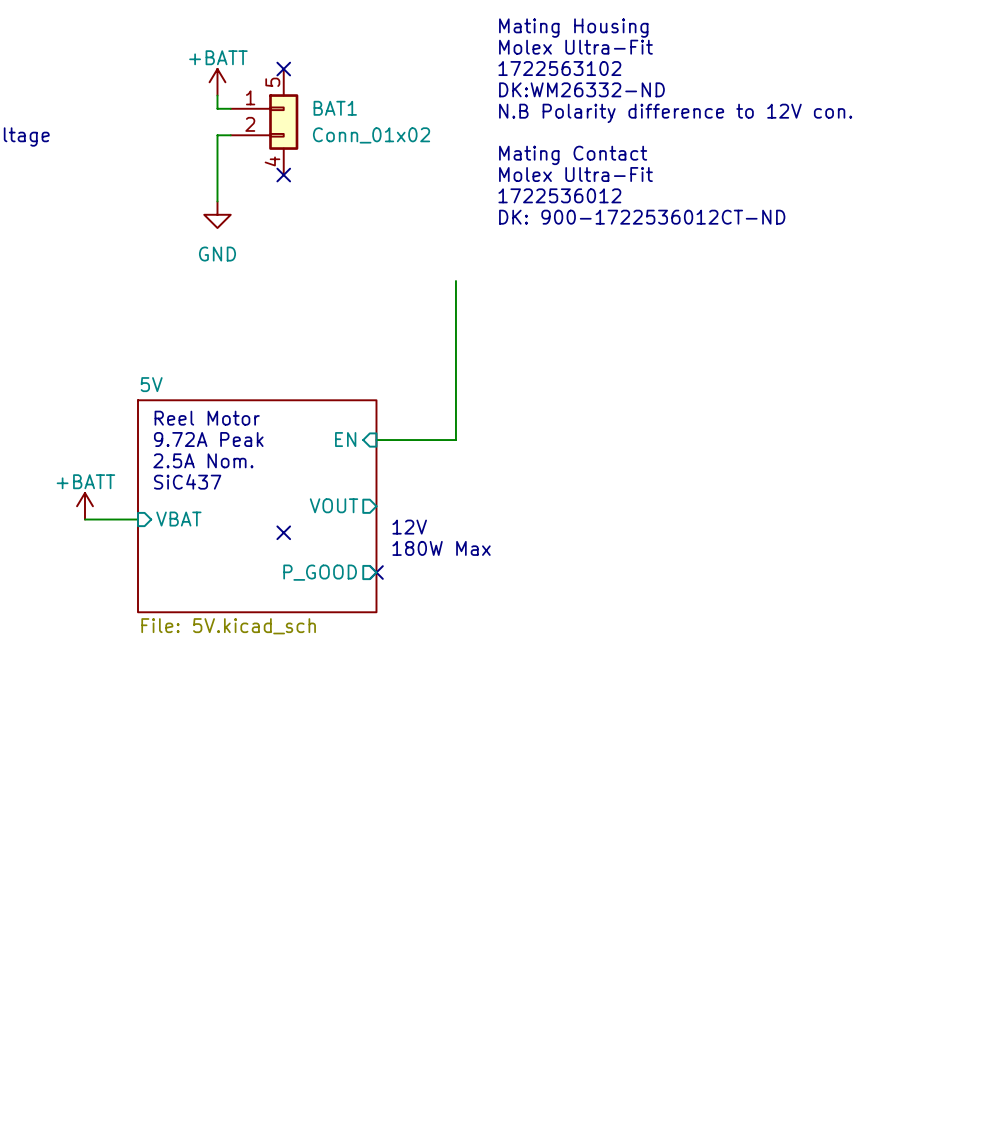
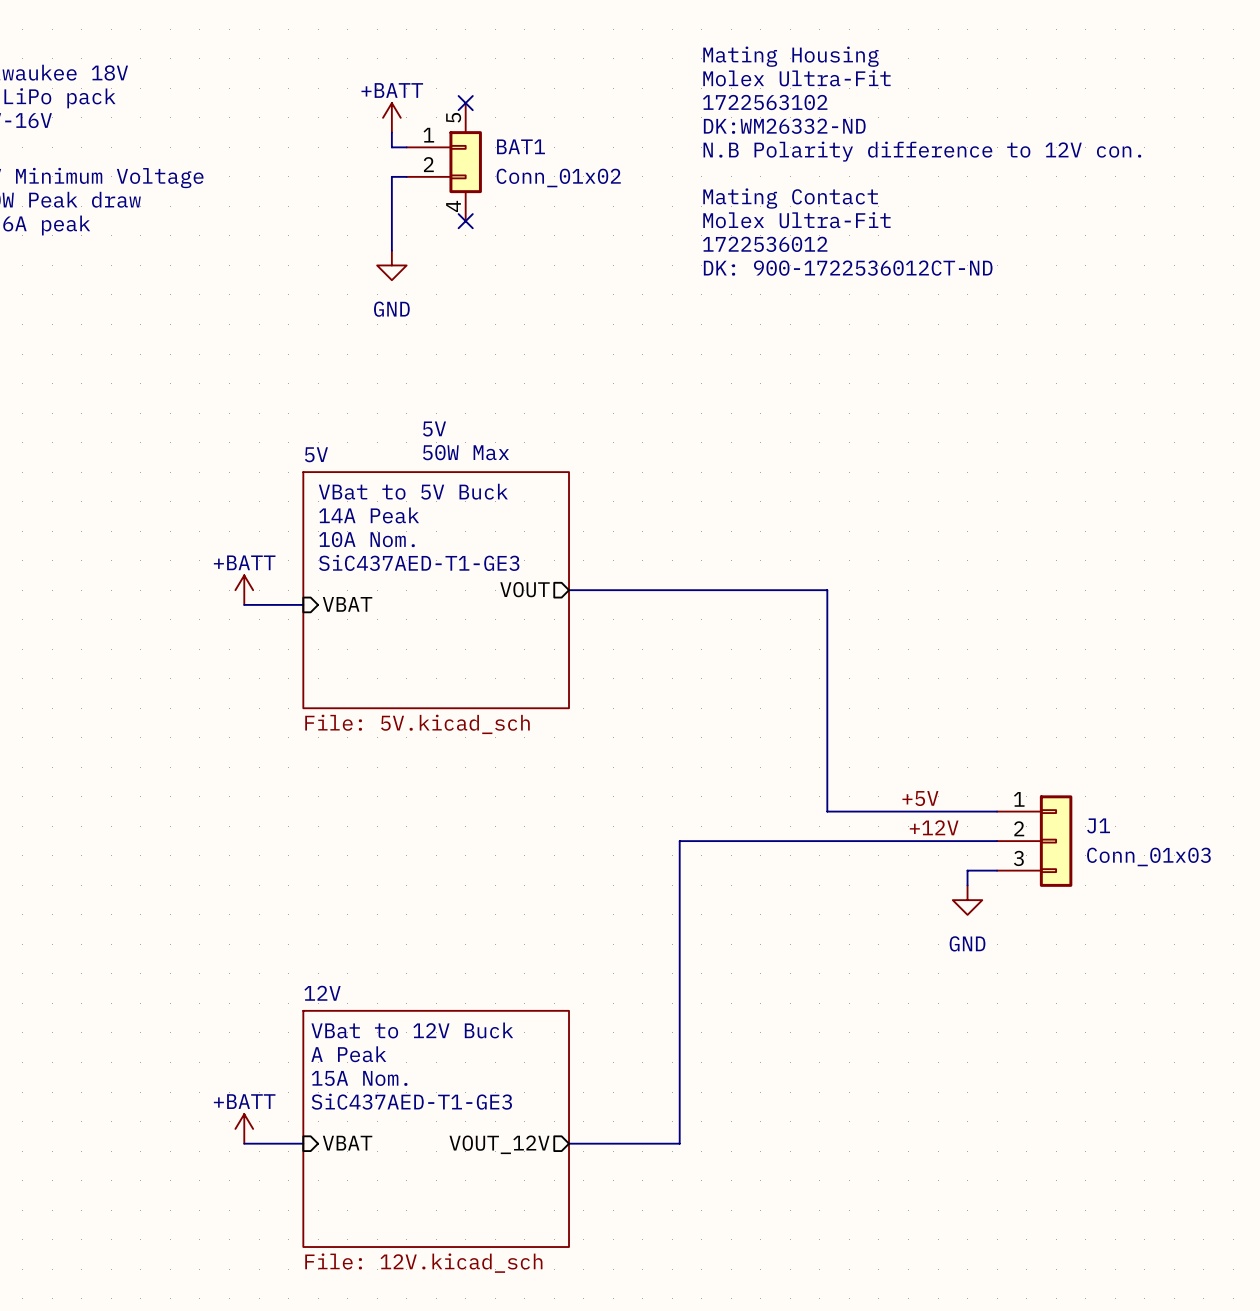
wire: (455, 281) (455, 440) (376, 440) -> none
text: none -> 5V (434, 428)
text: none -> 50W Max (465, 452)
text: Reel Motor (207, 418) -> VBat to 5V Buck (413, 491)
text: 9.72A Peak (208, 439) -> 14A Peak (369, 515)
sheet pin: EN (345, 439) -> none
text: 2.5A Nom. (203, 460) -> 10A Nom. (367, 539)
text: SiC437 (187, 481) -> SiC437AED-T1-GE3 (419, 562)
wire: none -> (569, 590) (827, 590) (827, 811) (997, 811)
text: 12V (409, 527) -> none
no-connect mark: (283, 532) -> none
text: 180W Max (441, 548) -> none
sheet pin: P_GOOD (320, 572) -> none
no-connect mark: (376, 572) -> none
label: none -> +5V (920, 798)
label: none -> +12V (934, 827)
wire: none -> (997, 841) (679, 841) (679, 1143) (569, 1143)
J1: none -> Conn_01x03 (1034, 841)
wire: none -> (997, 870) (967, 870) (967, 885)
power symbol: none -> GND (967, 900)
text: none -> VBat to 12V Buck (412, 1030)
text: none -> A Peak (348, 1054)
text: none -> 15A Nom. (359, 1078)
text: none -> SiC437AED-T1-GE3 (411, 1101)
power symbol: none -> +BATT (244, 1128)
sheet 12V: none -> File: 12V.kicad_sch (436, 1128)
sheet pin: none -> VBAT (347, 1143)
wire: none -> (244, 1143) (303, 1143)
sheet pin: none -> VOUT_12V (499, 1144)

